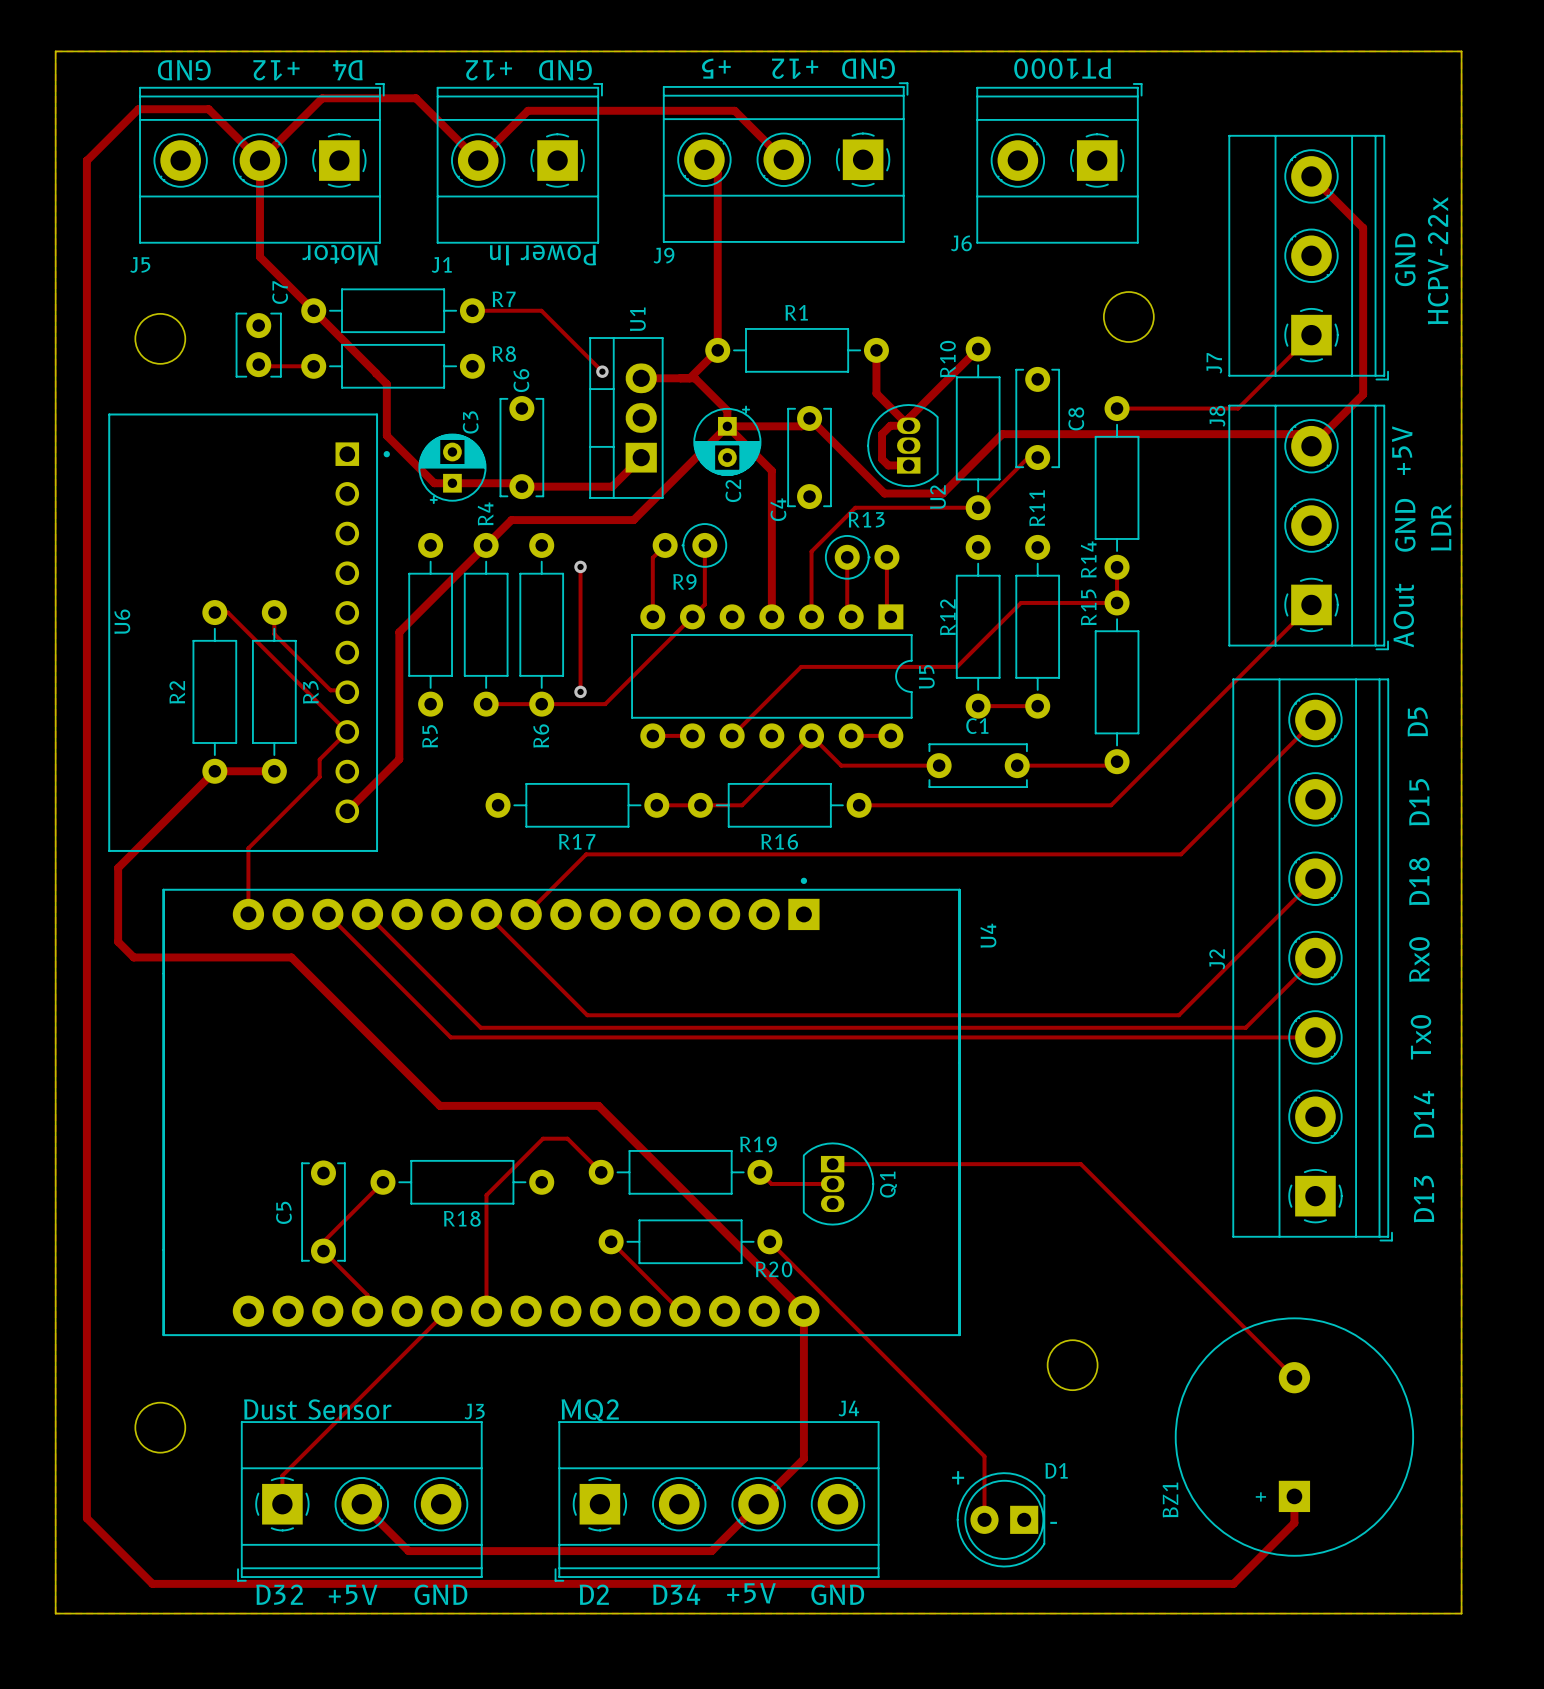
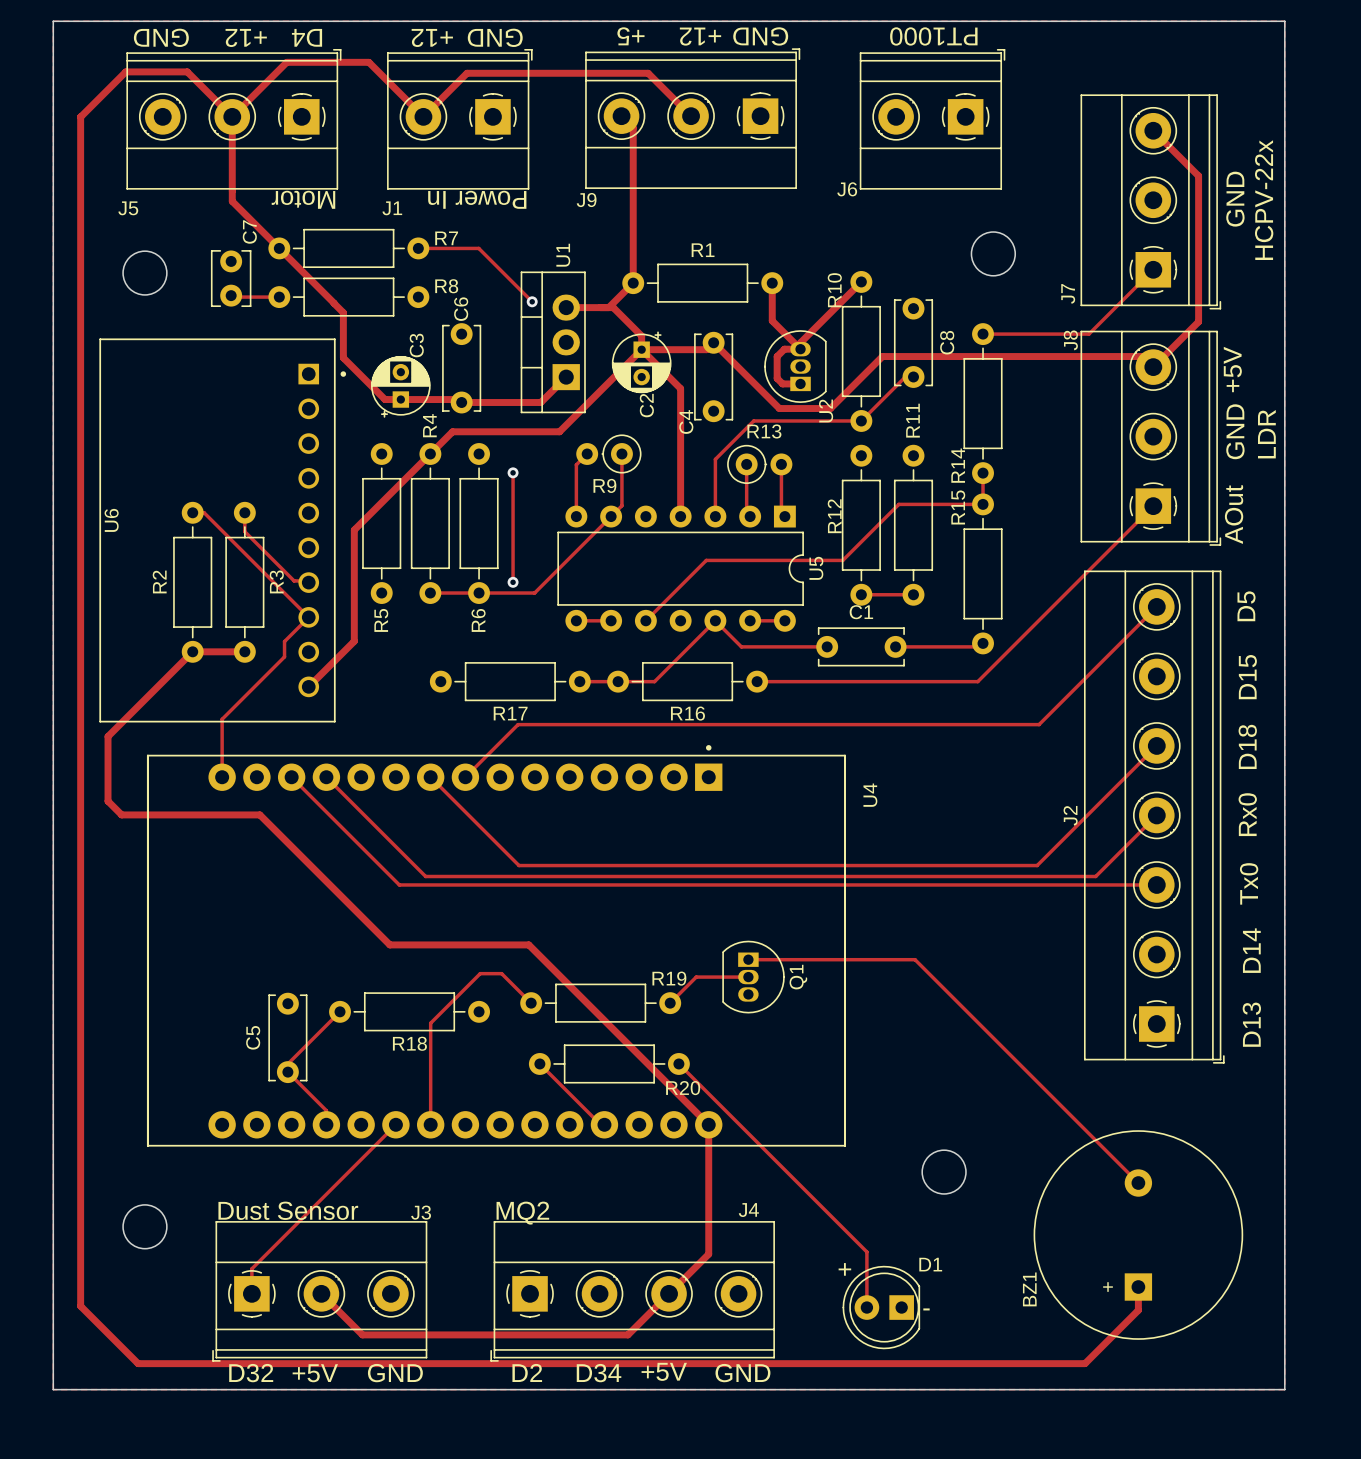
track: (832, 1164) (1080, 1164) -> (748, 959) (915, 959) (951, 995)
track: (759, 1172) (771, 1183) (832, 1183) -> (670, 1003) (696, 977) (748, 977)
Q1 position: (838, 1183) -> (753, 977)

